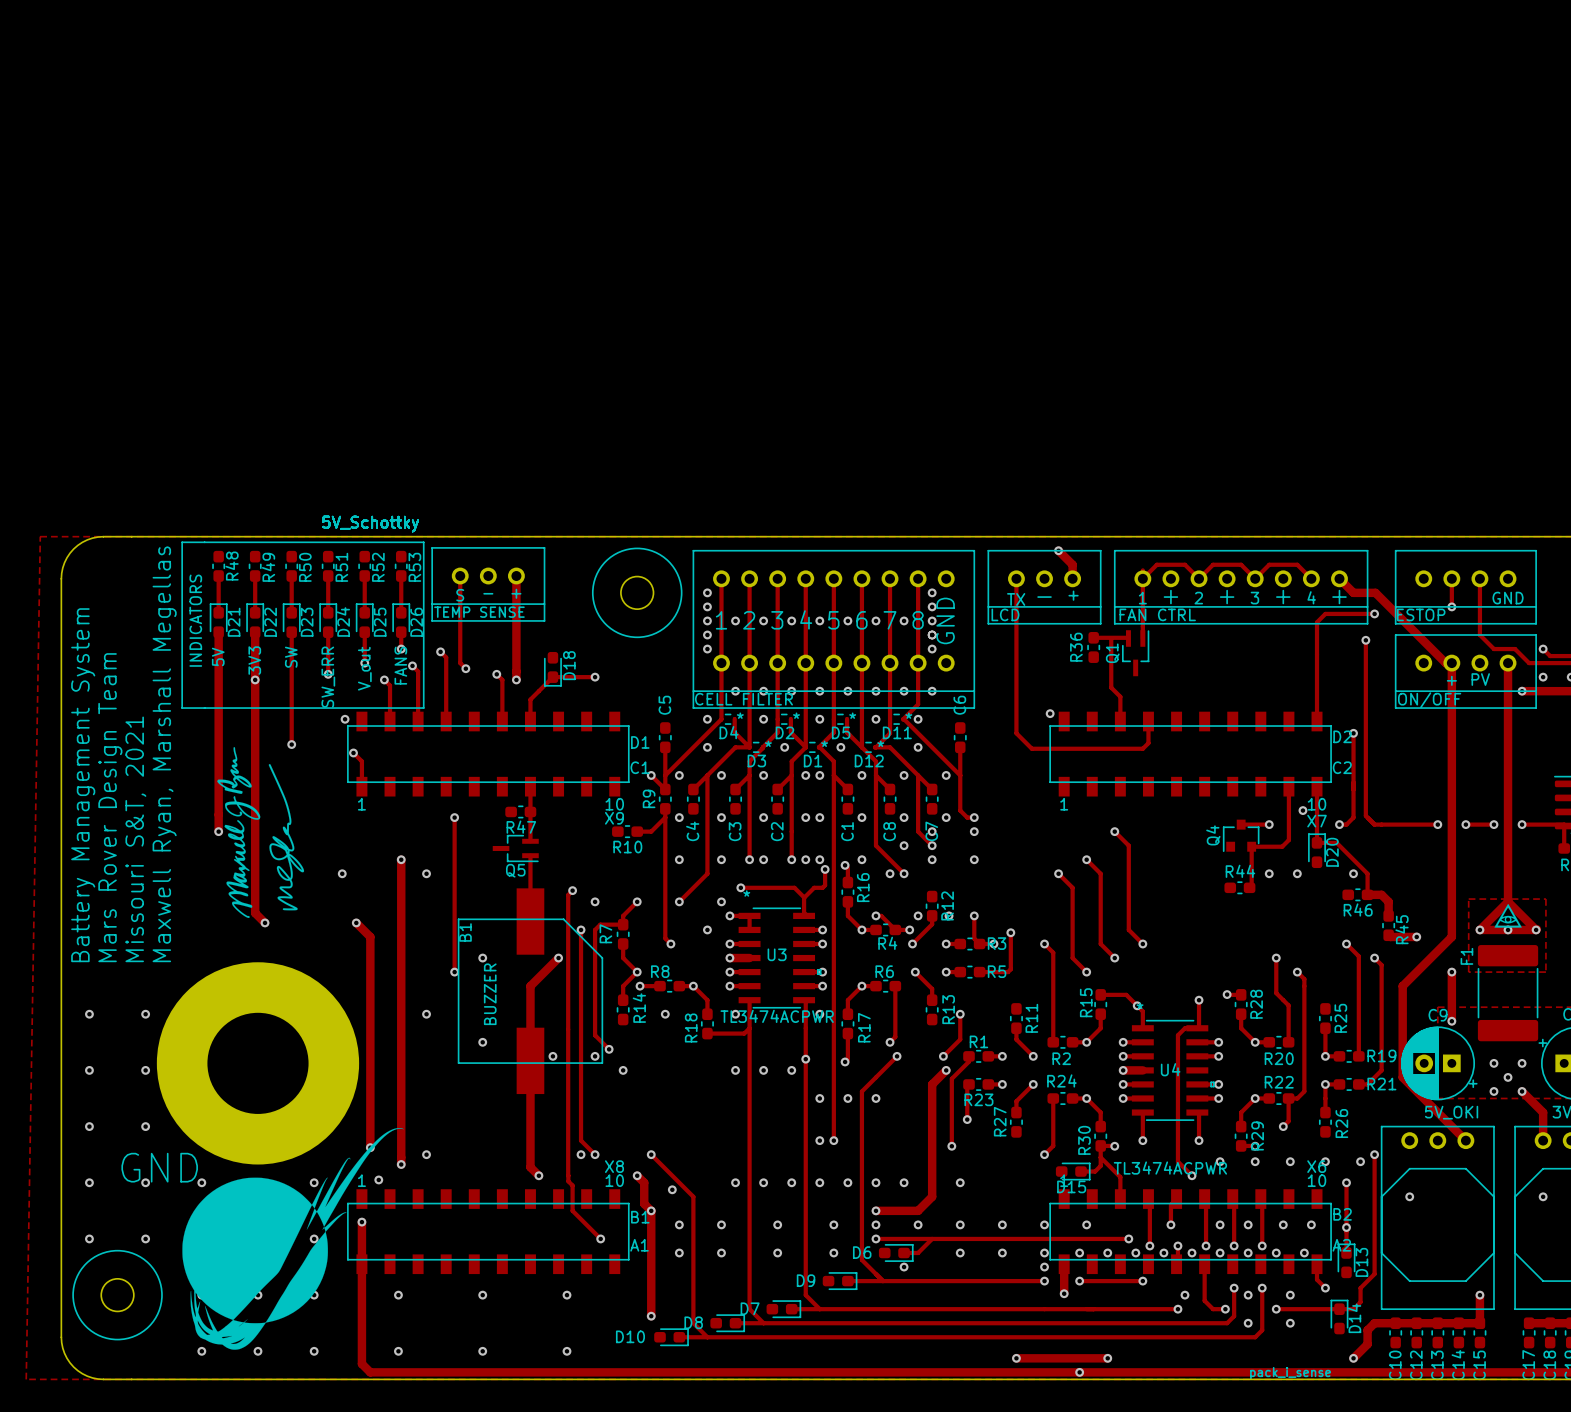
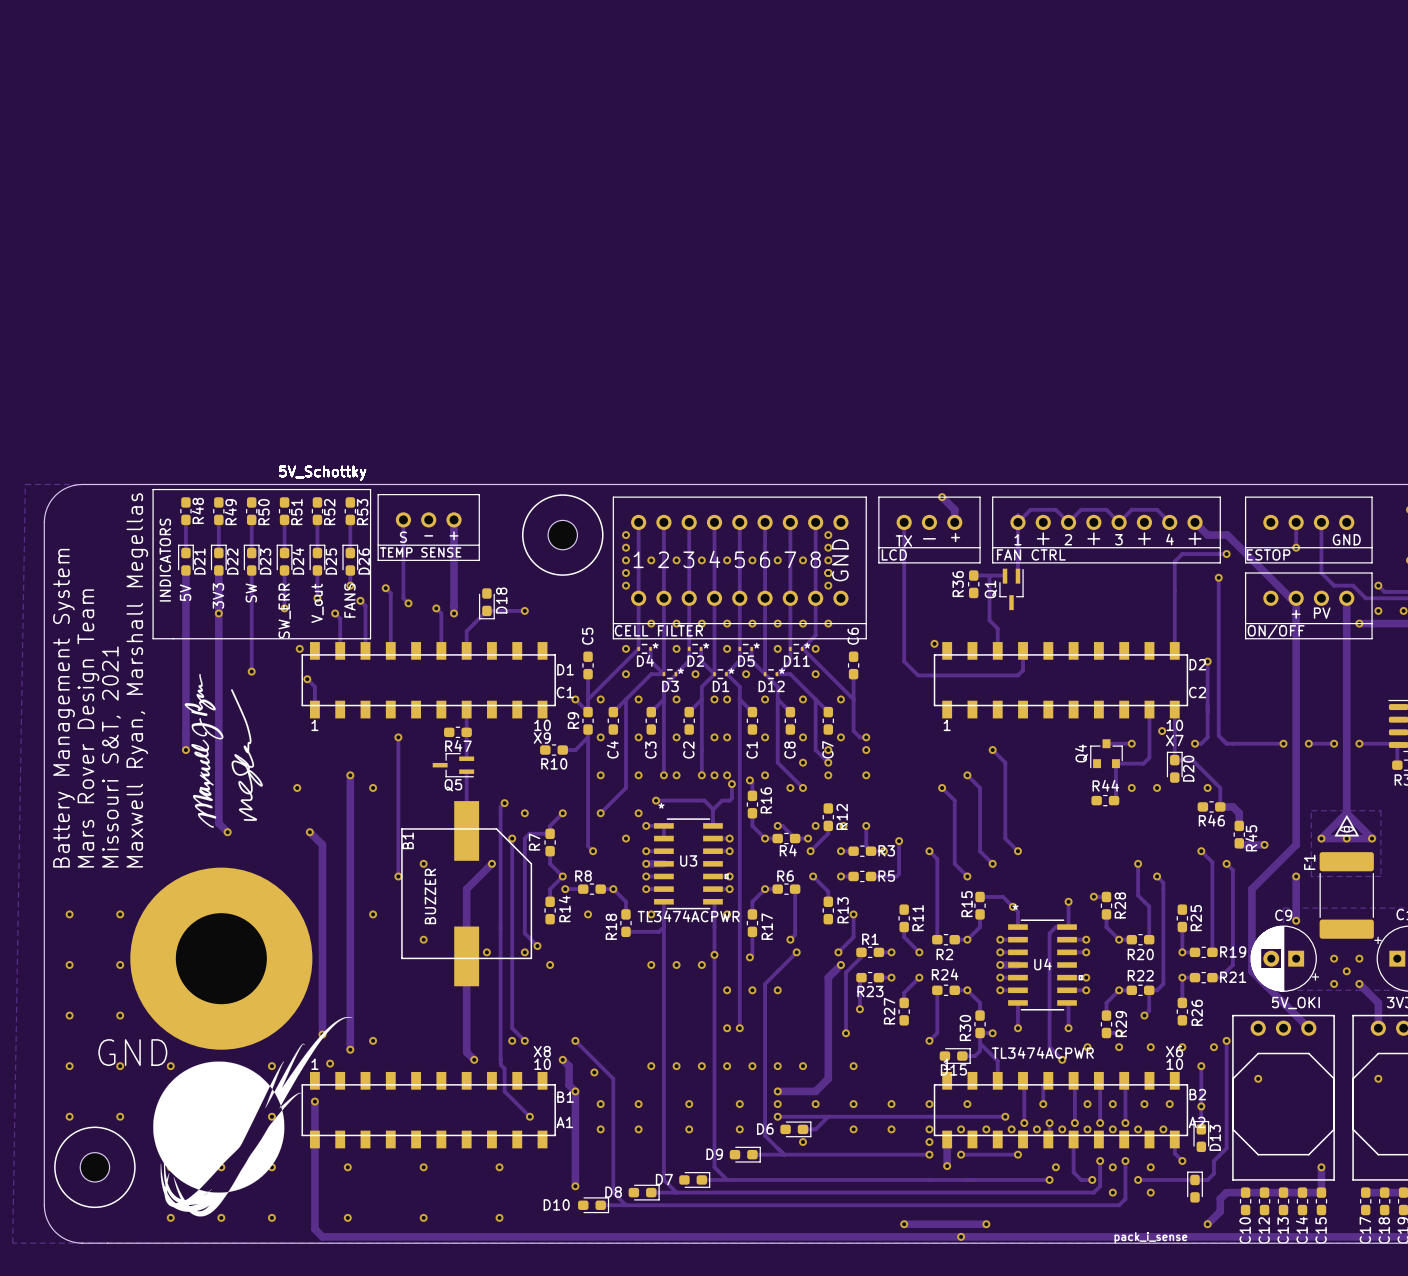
D14 name: D14 (1354, 1318) -> none

